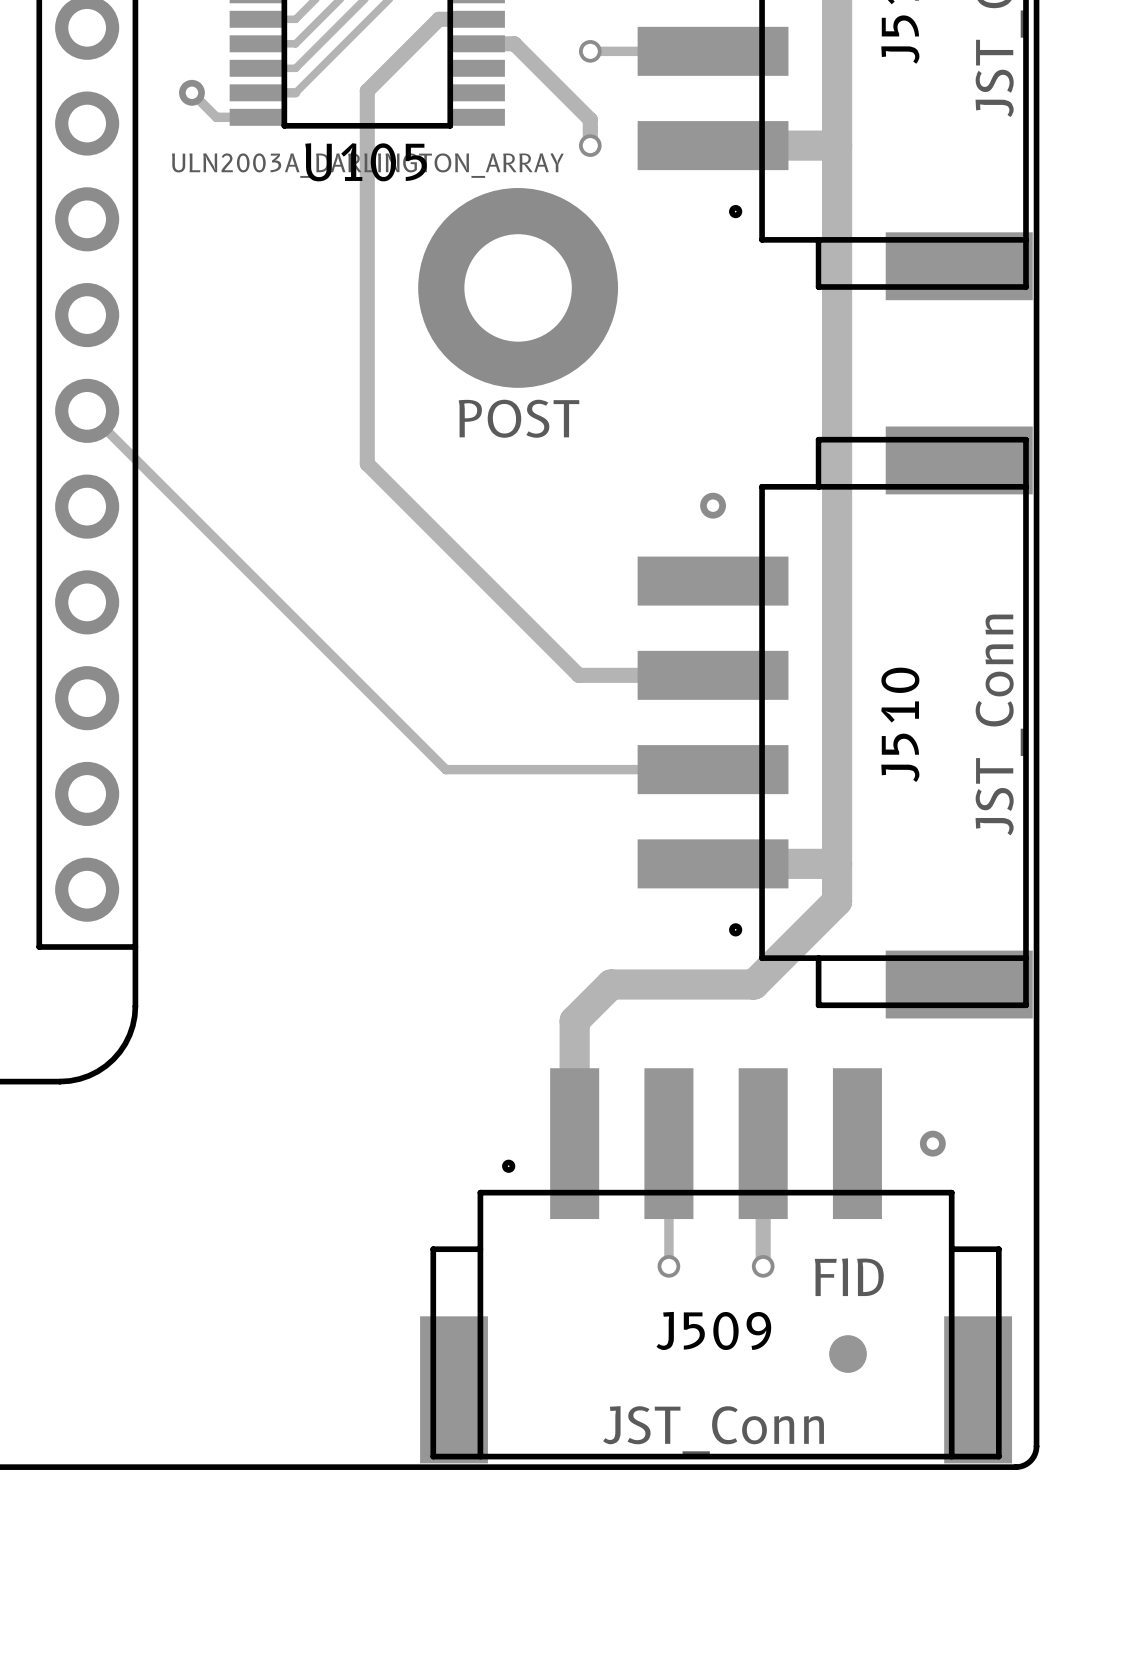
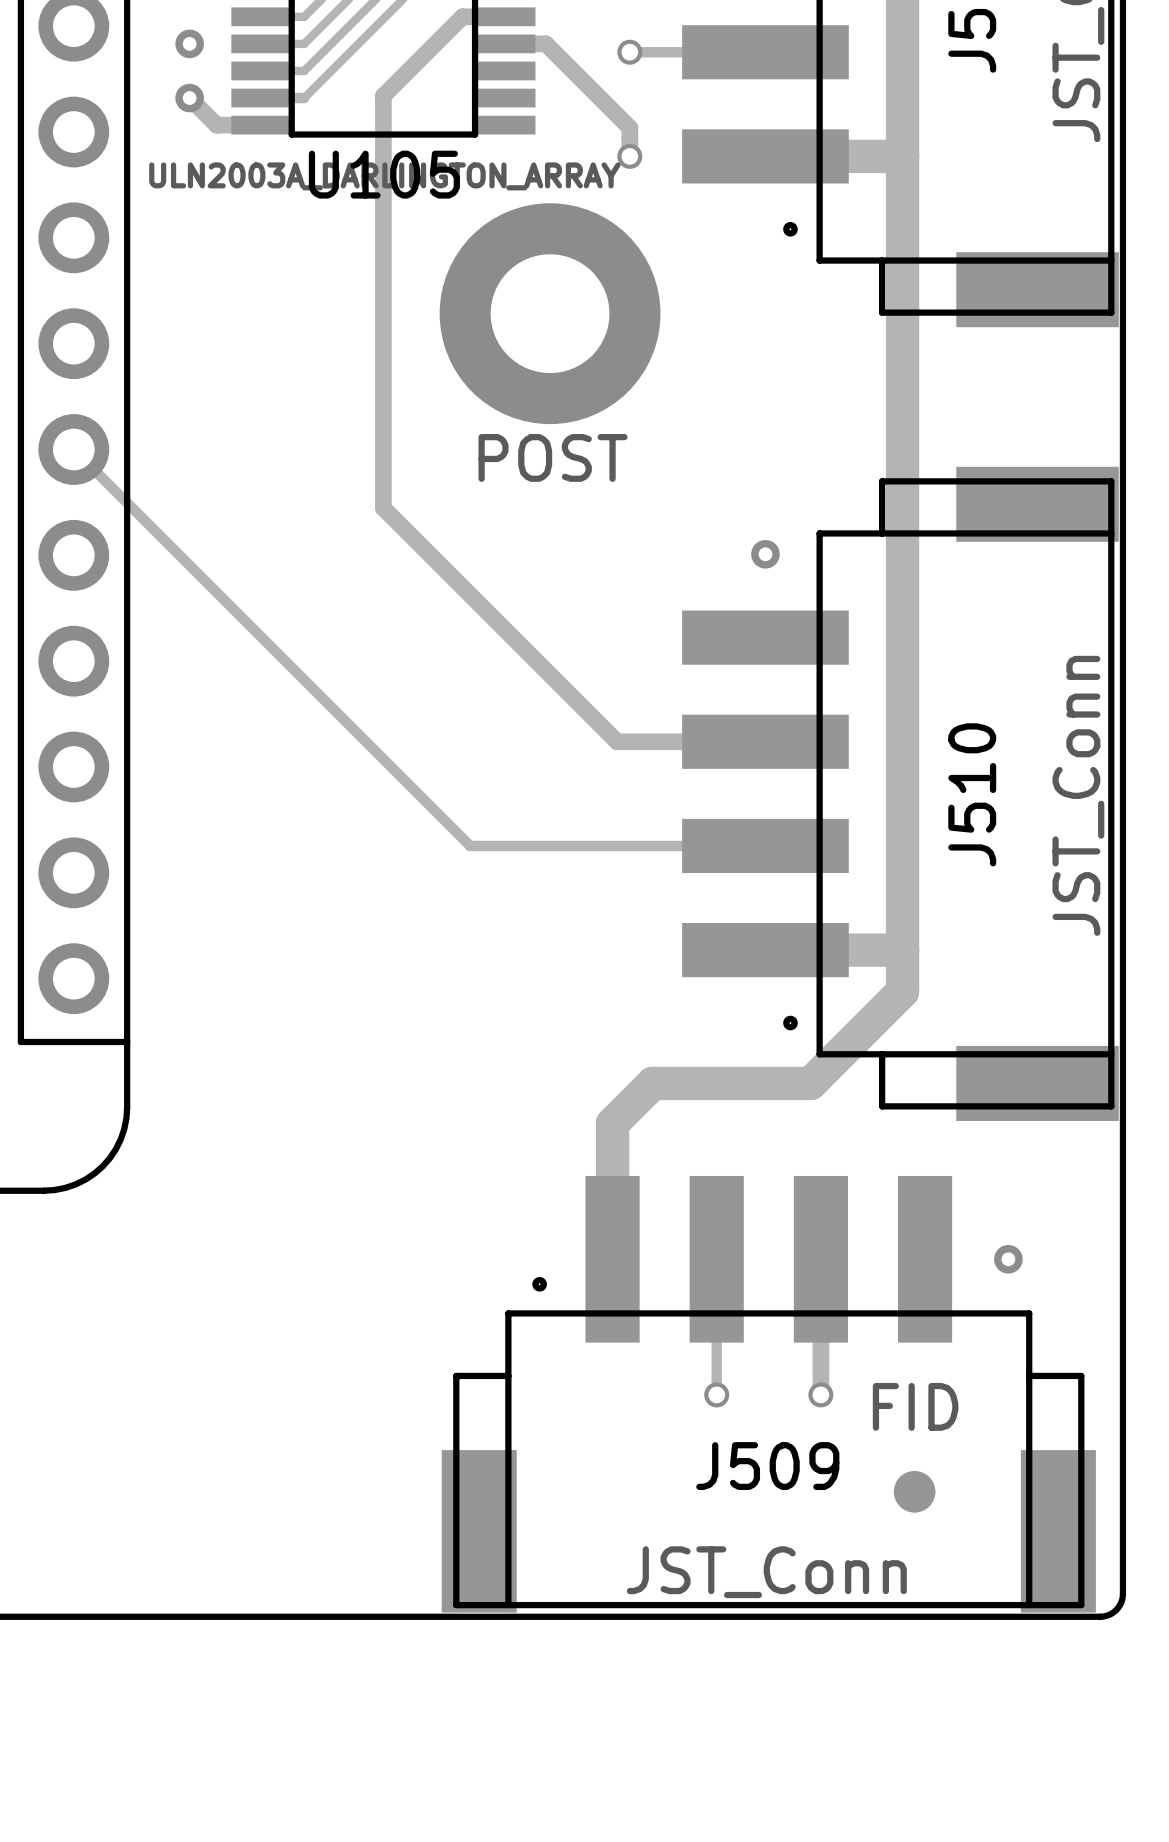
part: none -> (189, 43)
track width: thin (191, 92) (216, 117) (257, 117) -> thick (189, 98) (216, 125) (262, 125)

